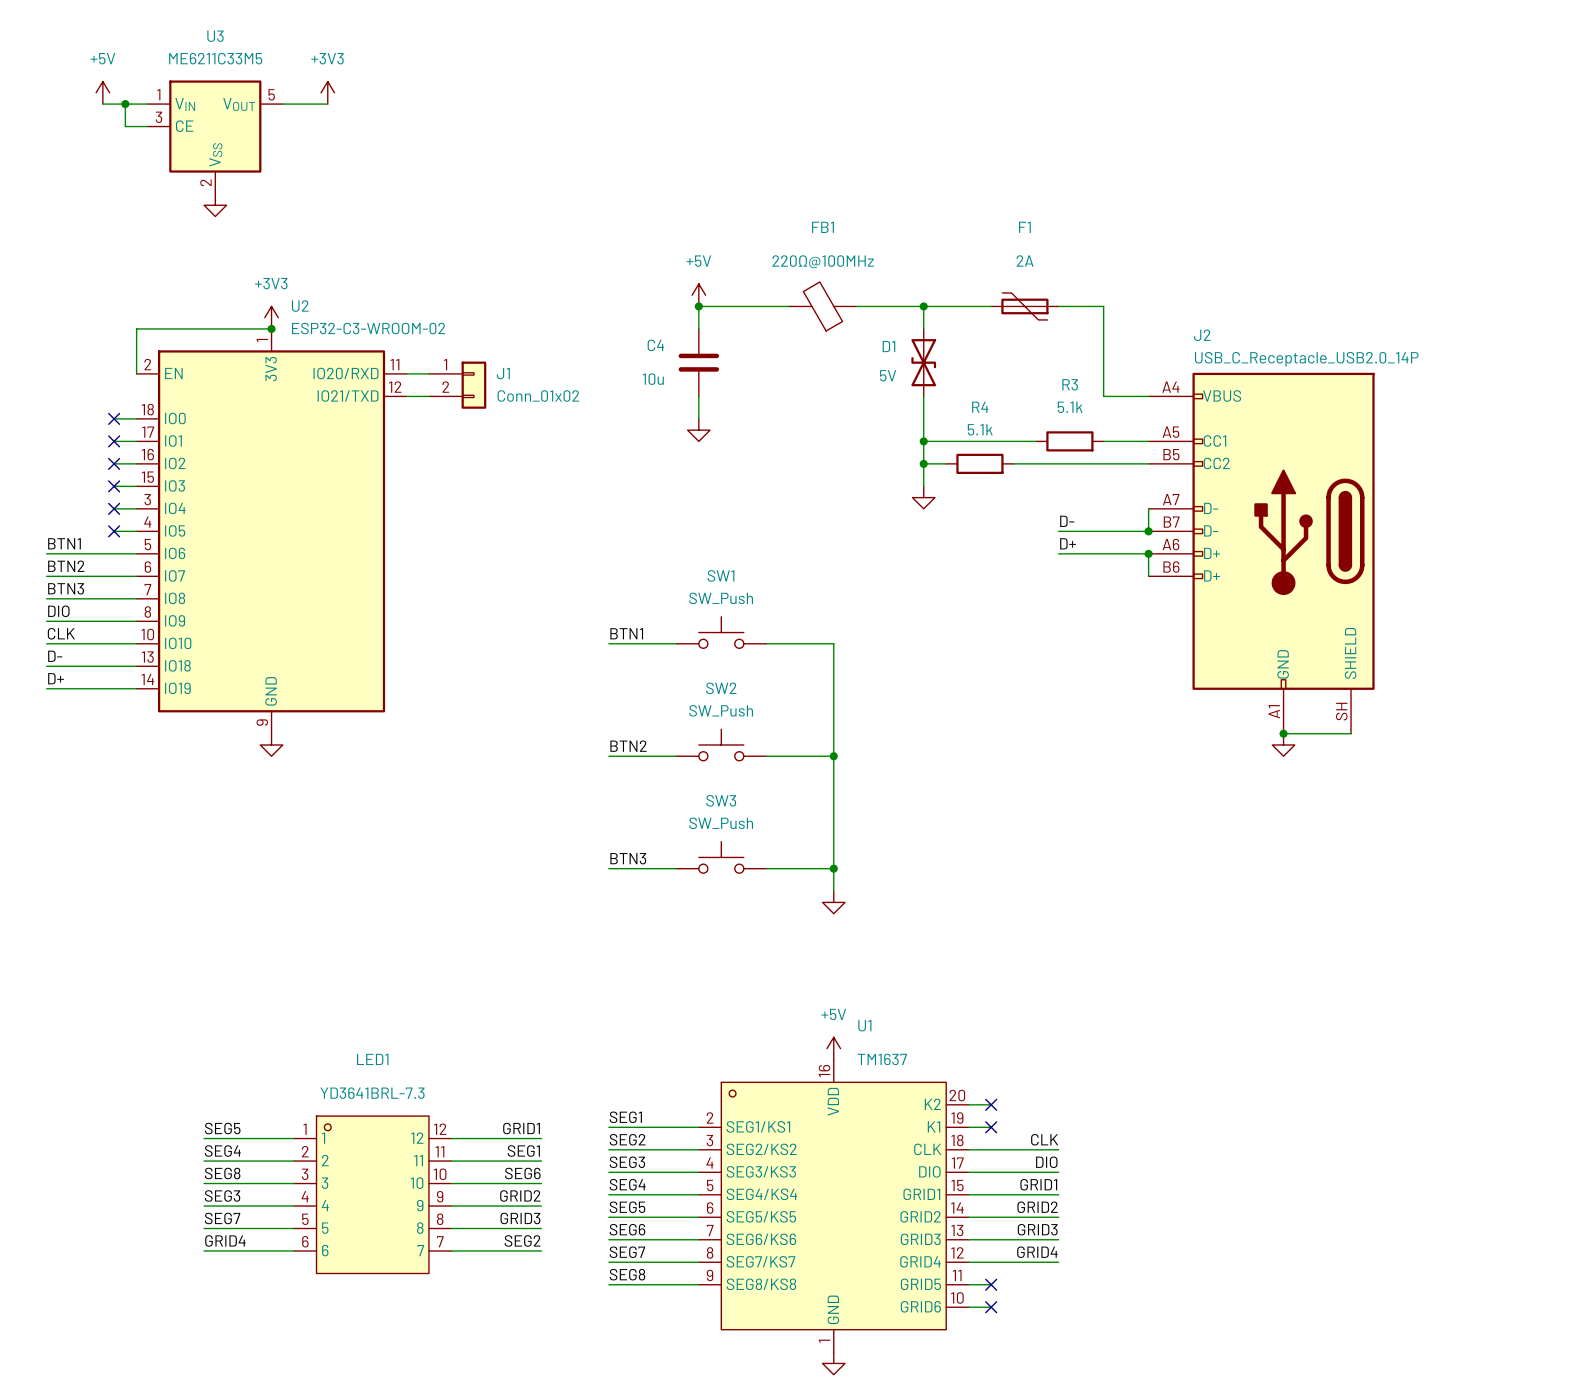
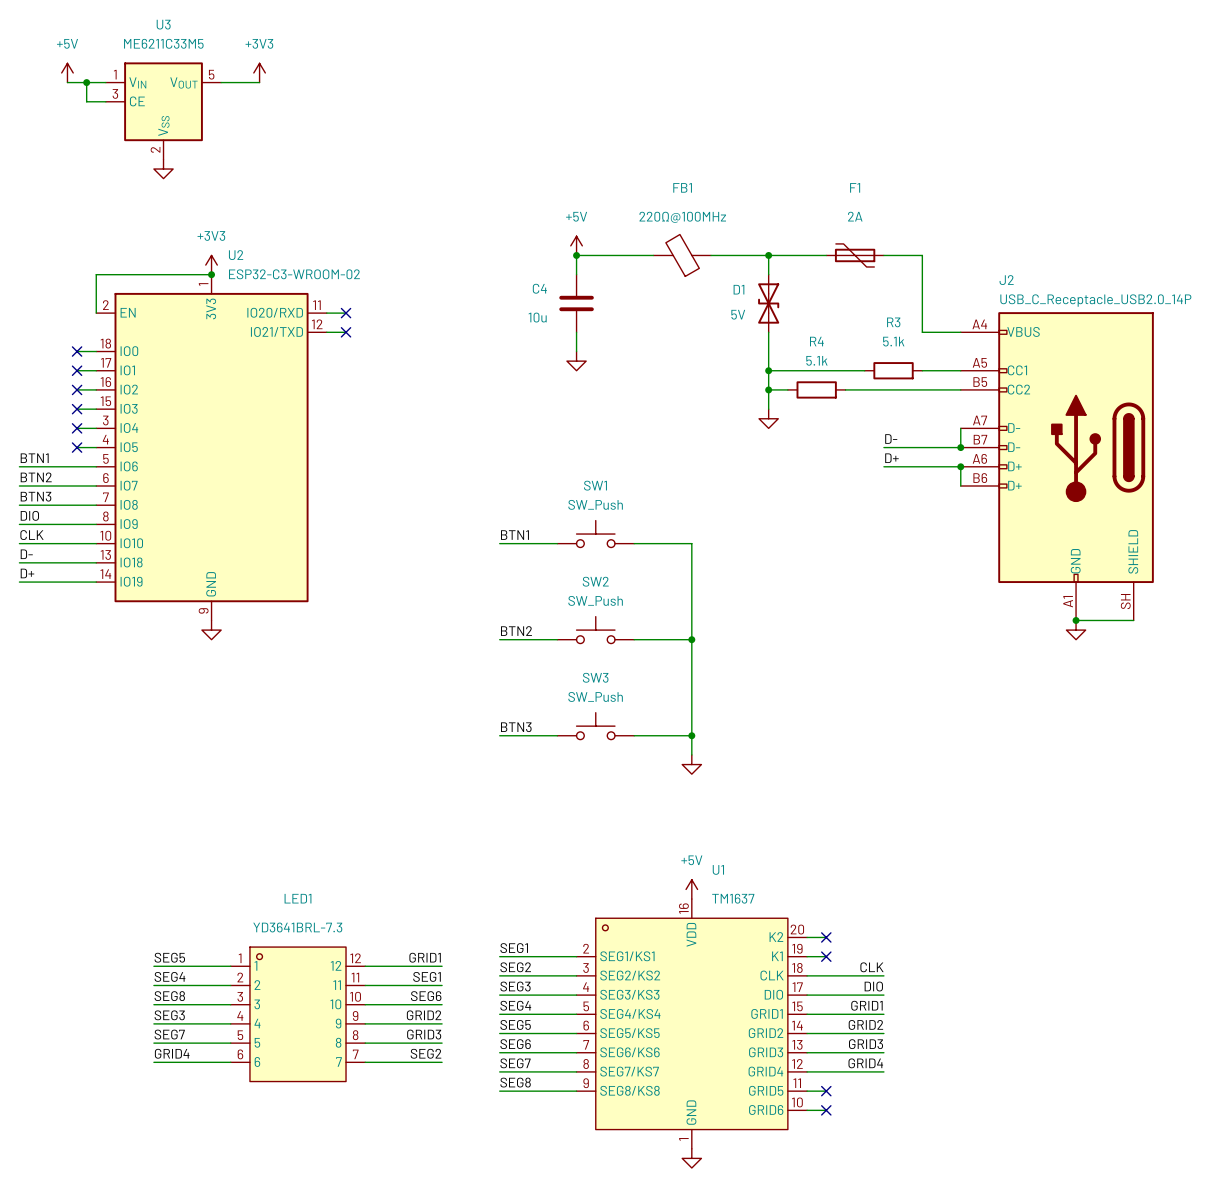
no-connect mark: none -> (346, 313)
J1: Conn_01x02 (457, 385) -> none
no-connect mark: none -> (346, 332)

